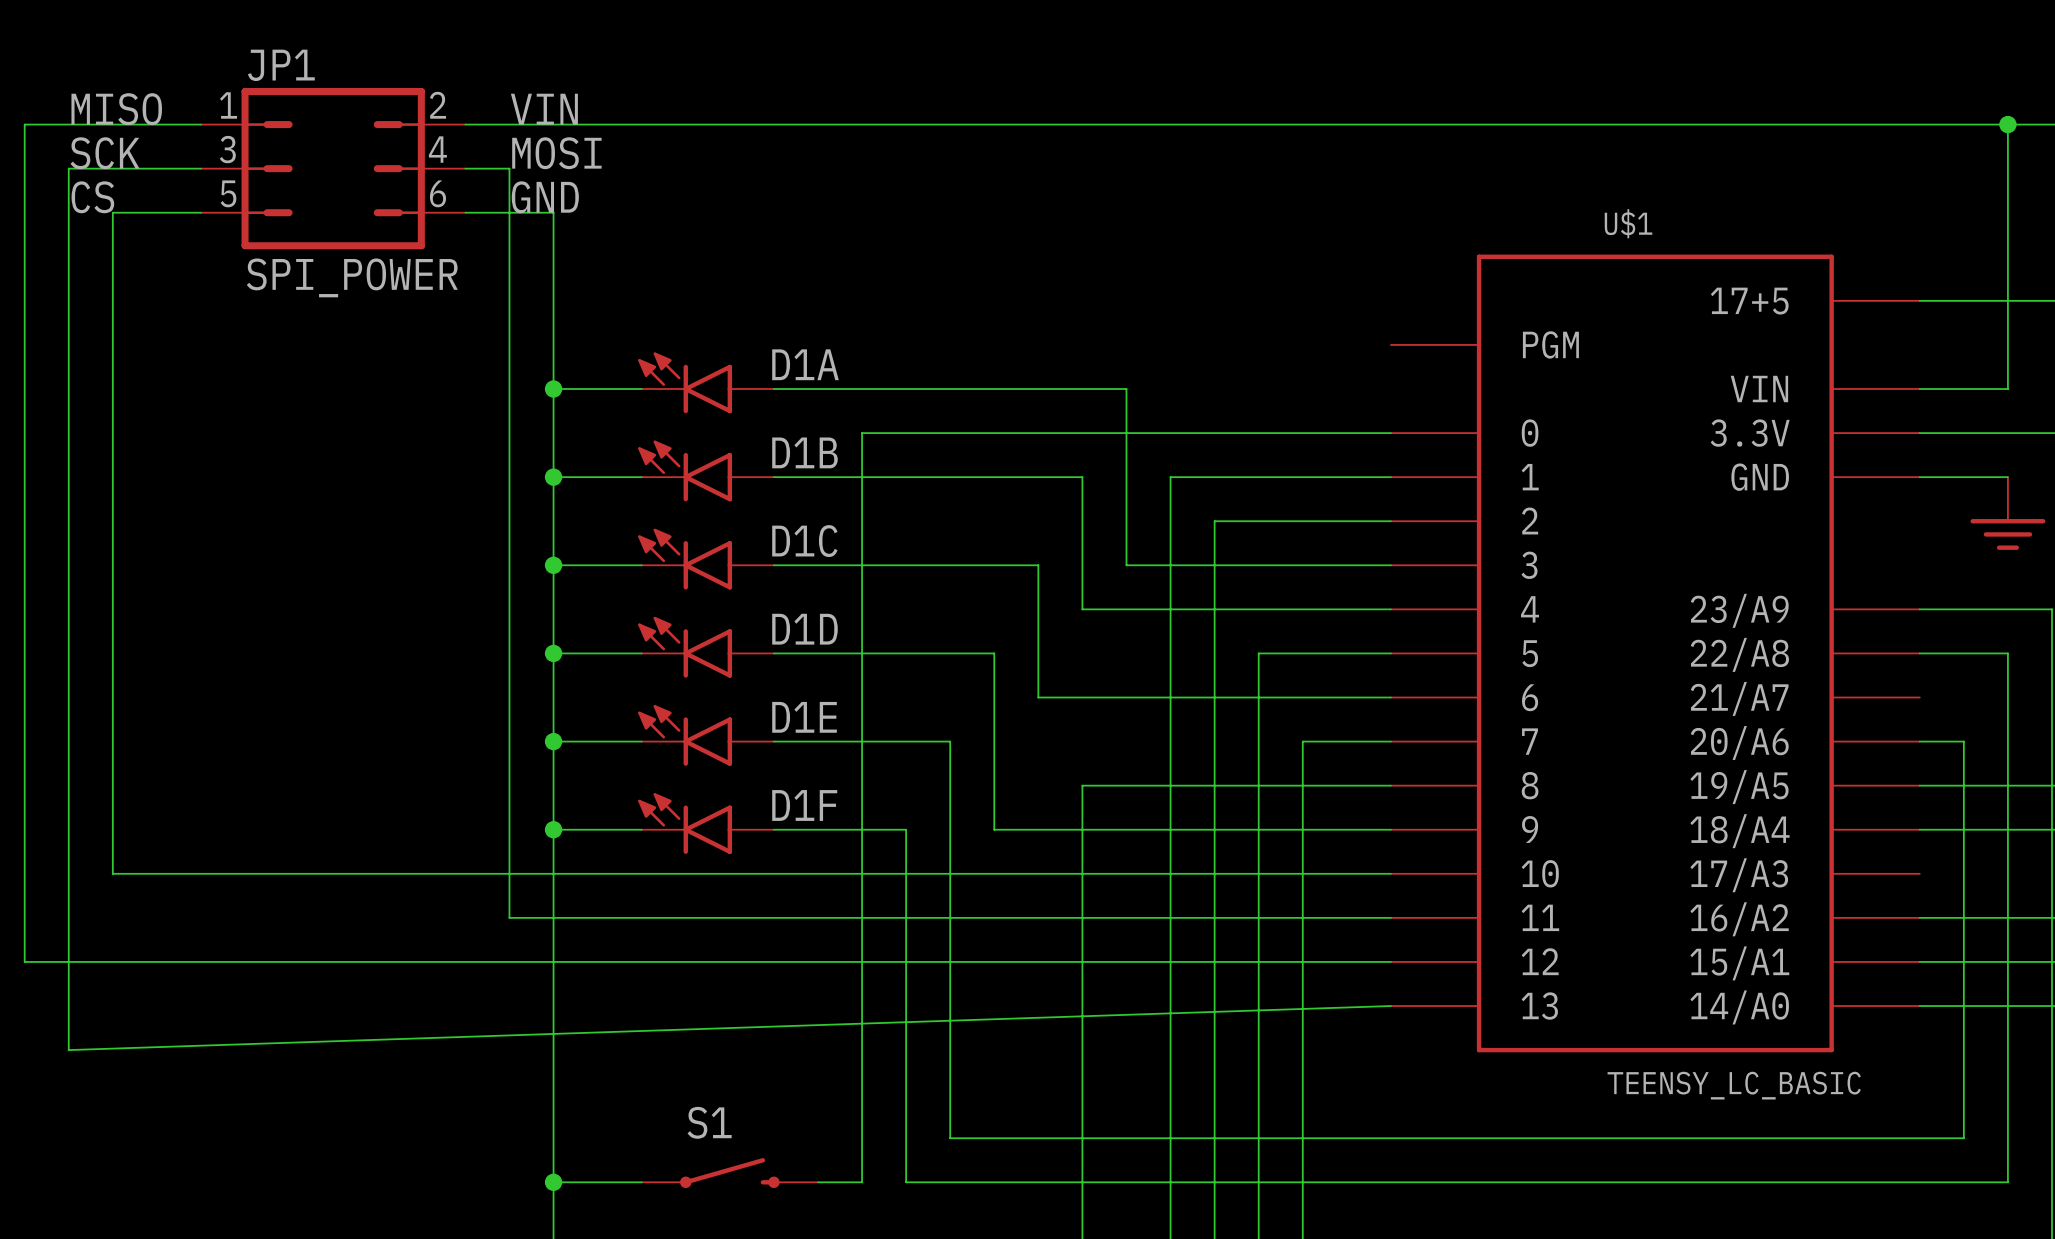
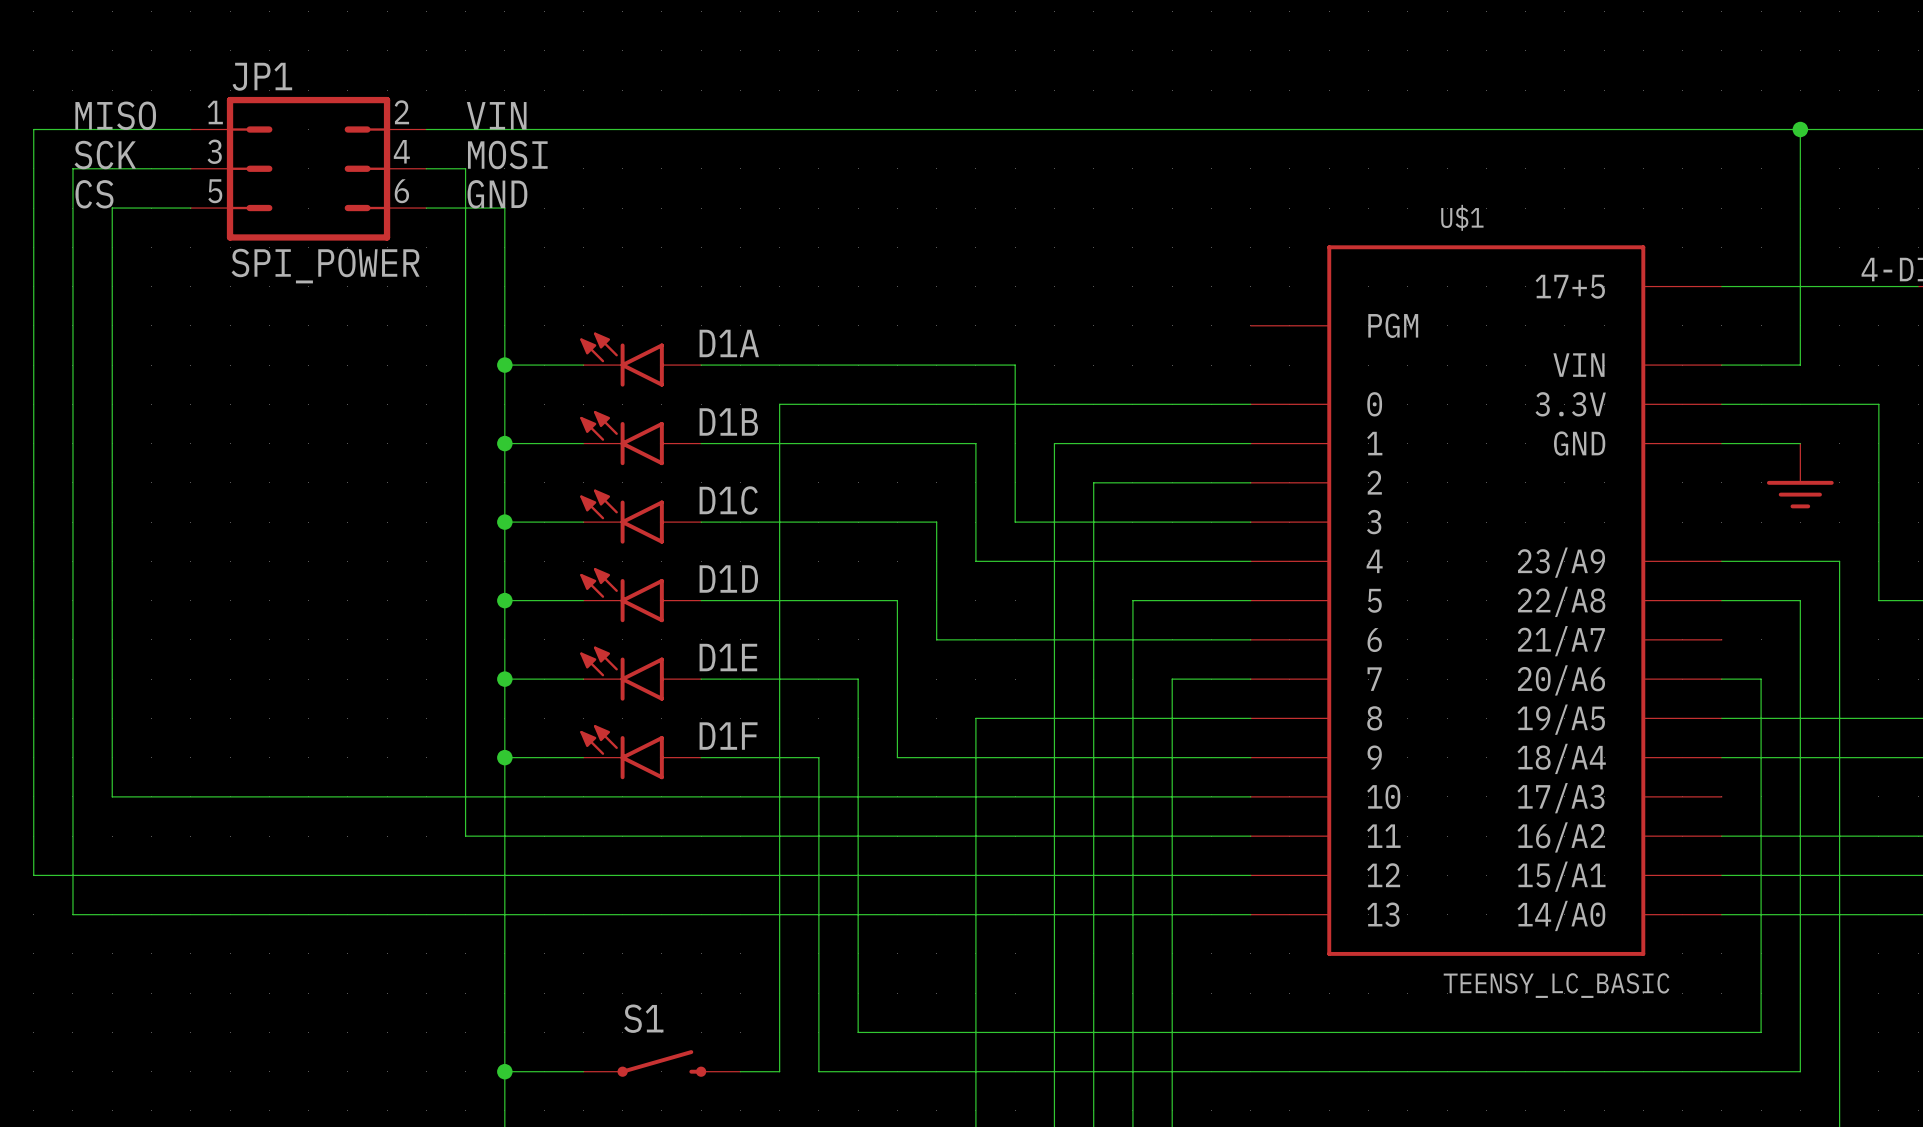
wire: (68, 1006) (68, 1050) (1390, 1006) -> (72, 914) (1250, 914)

